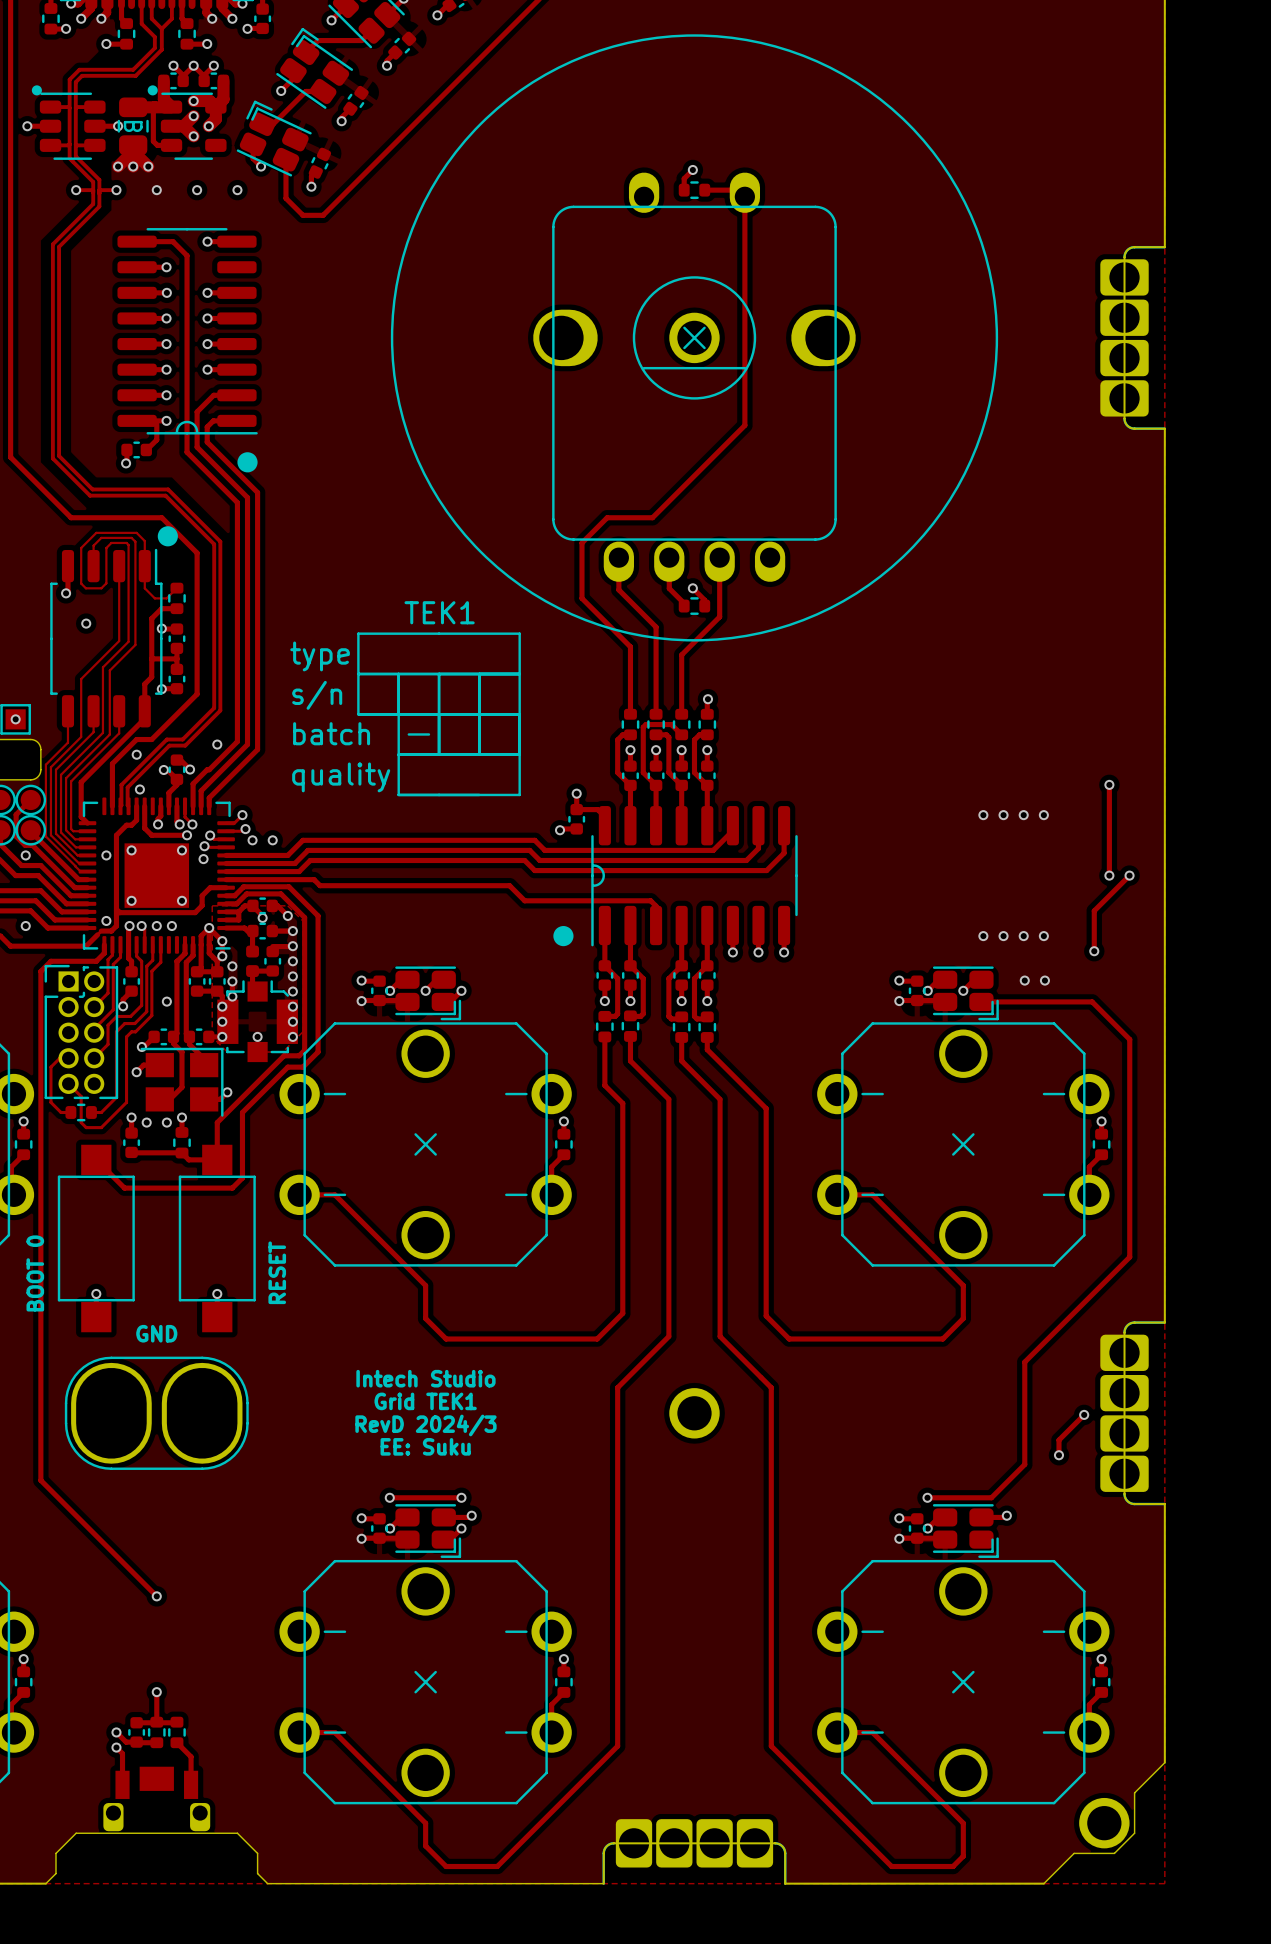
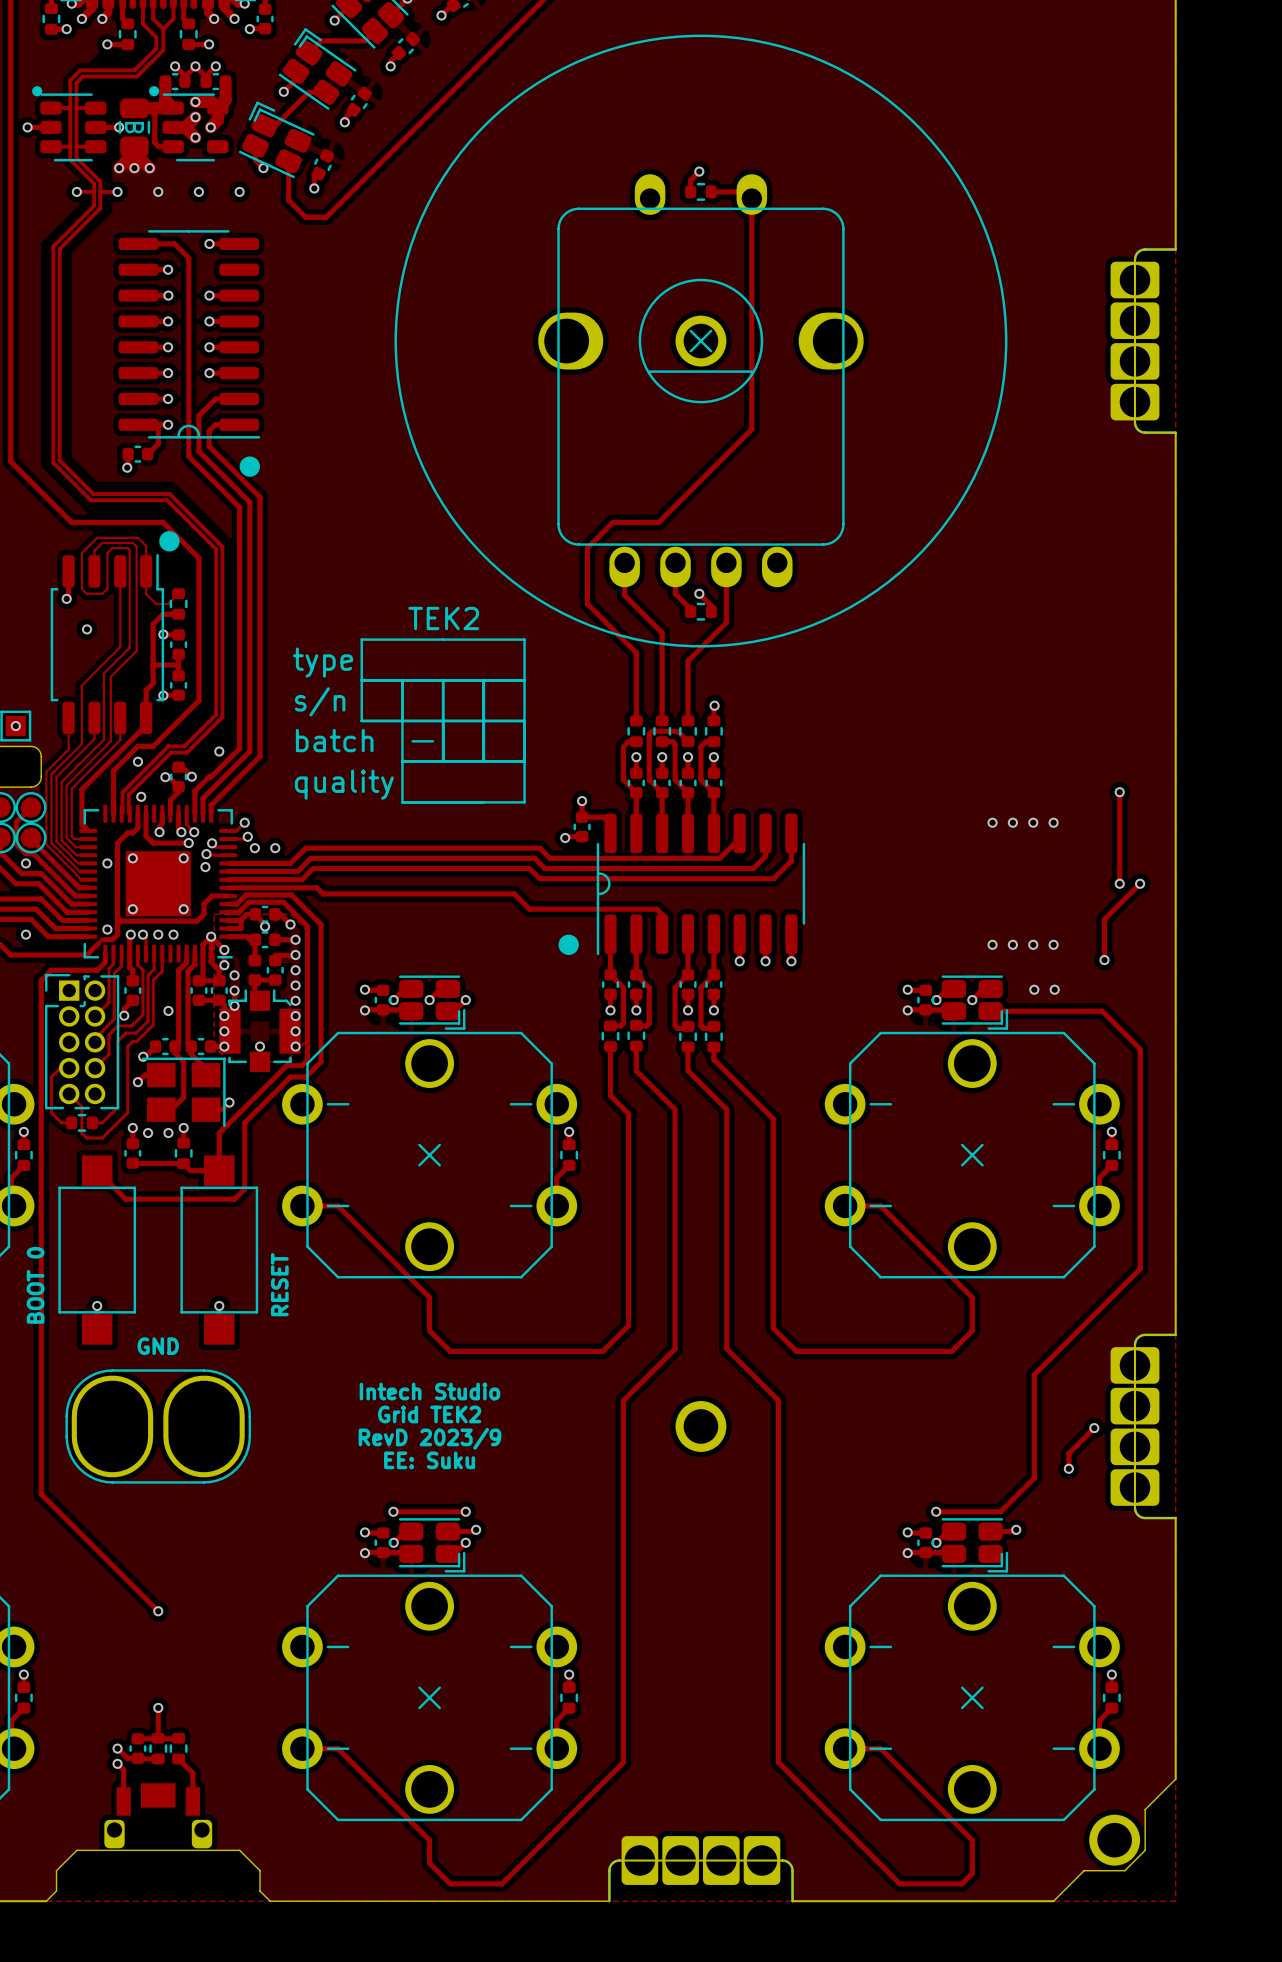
text: TEK1 (439, 612) -> TEK2 (443, 618)
text: Grid TEK1 (425, 1401) -> Grid TEK2 (429, 1414)
text: RevD 2024/3 (425, 1425) -> RevD 2023/9 (429, 1438)

